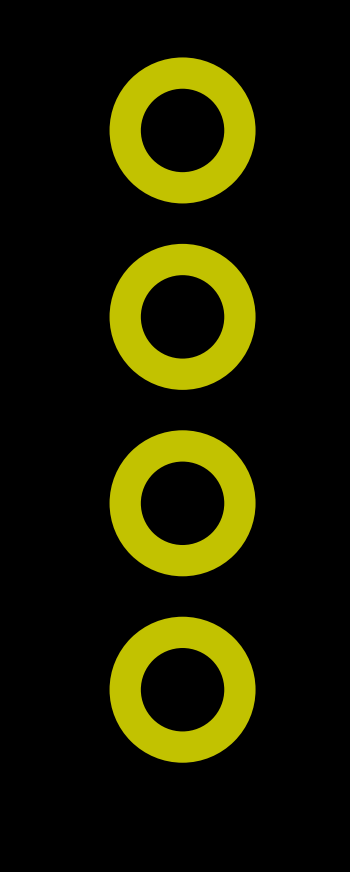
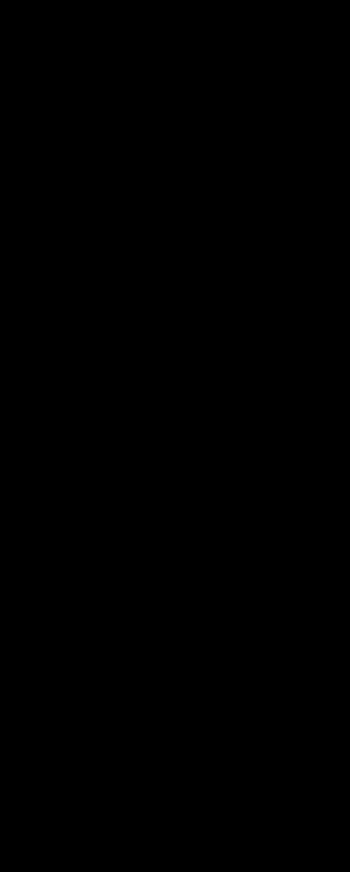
part: (182, 130) -> none
part: (182, 316) -> none
part: (182, 503) -> none
part: (182, 689) -> none

